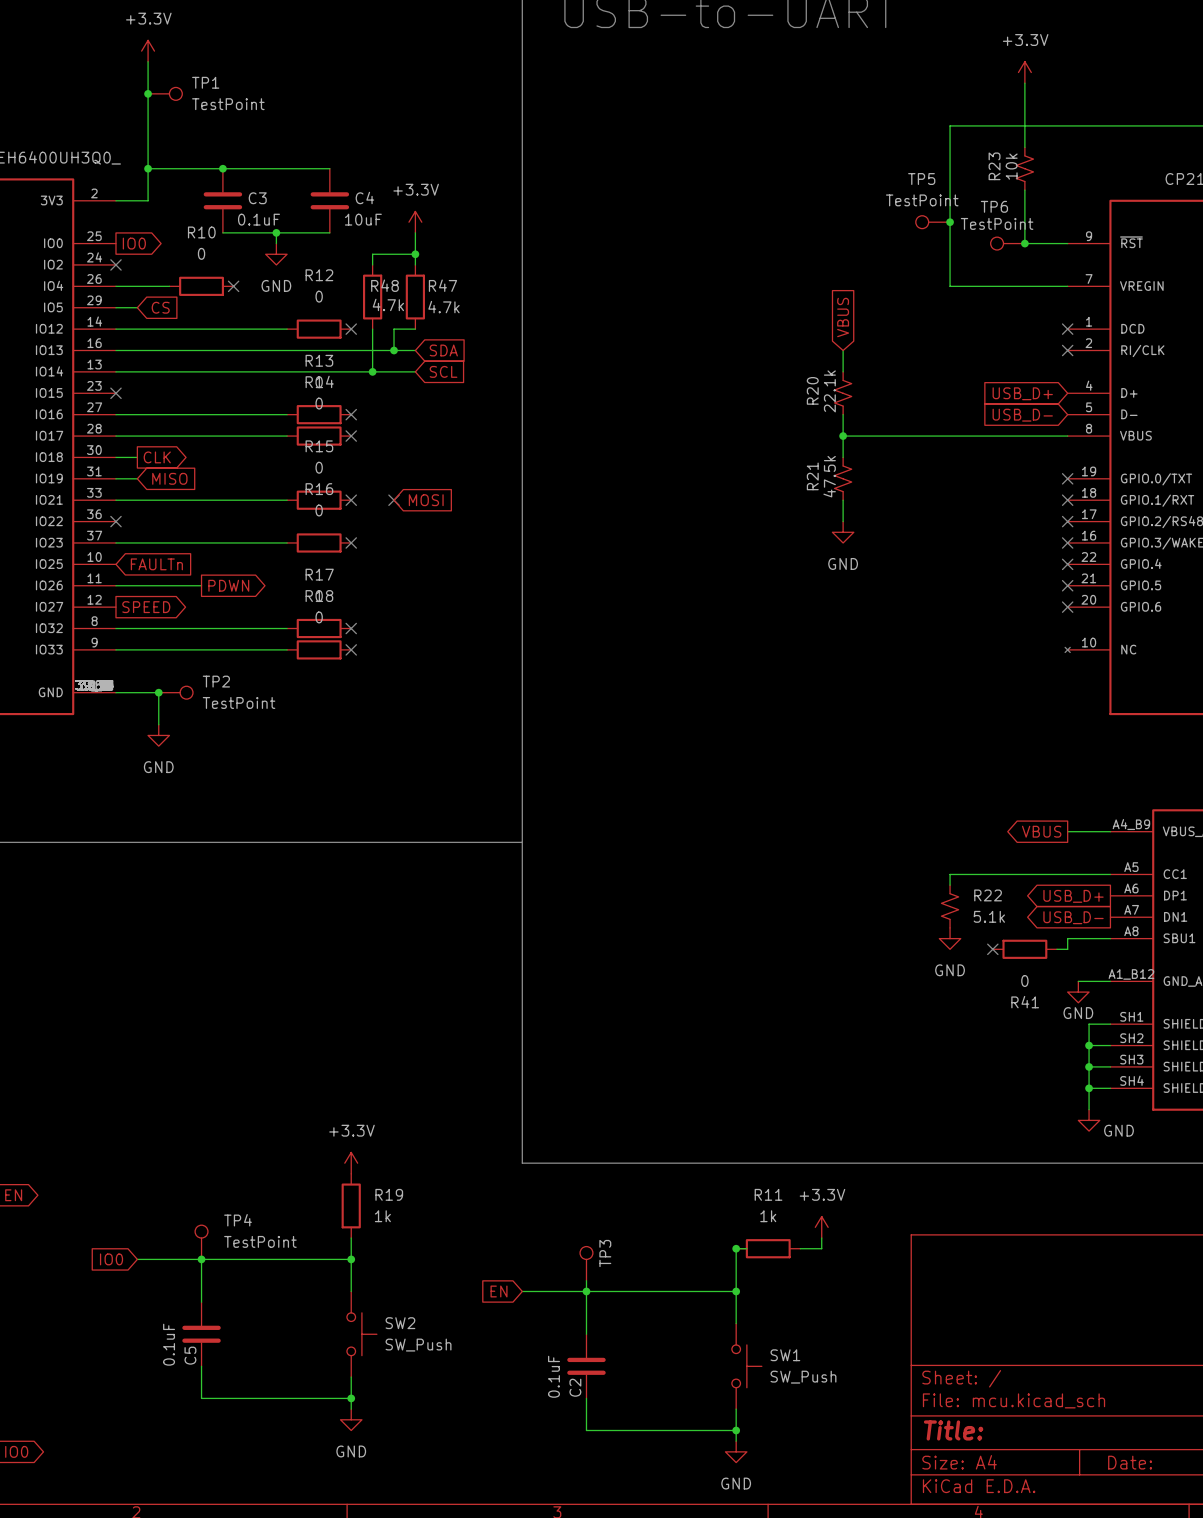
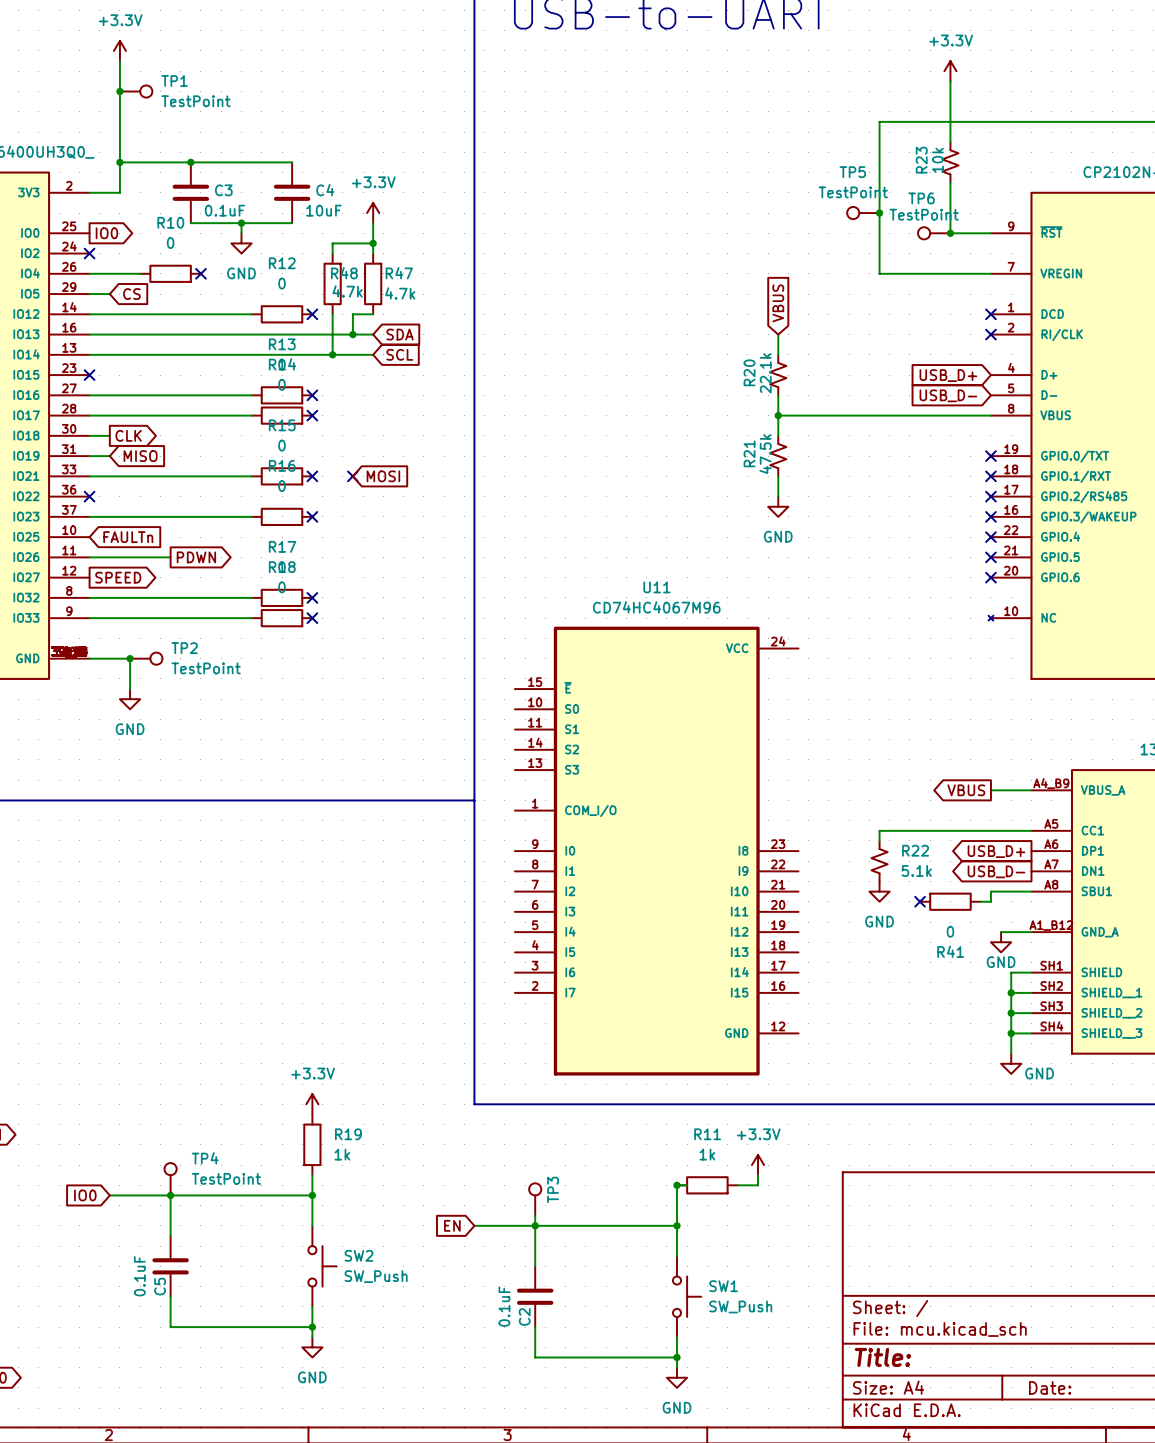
U11: none -> CD74HC4067M96 (656, 851)

